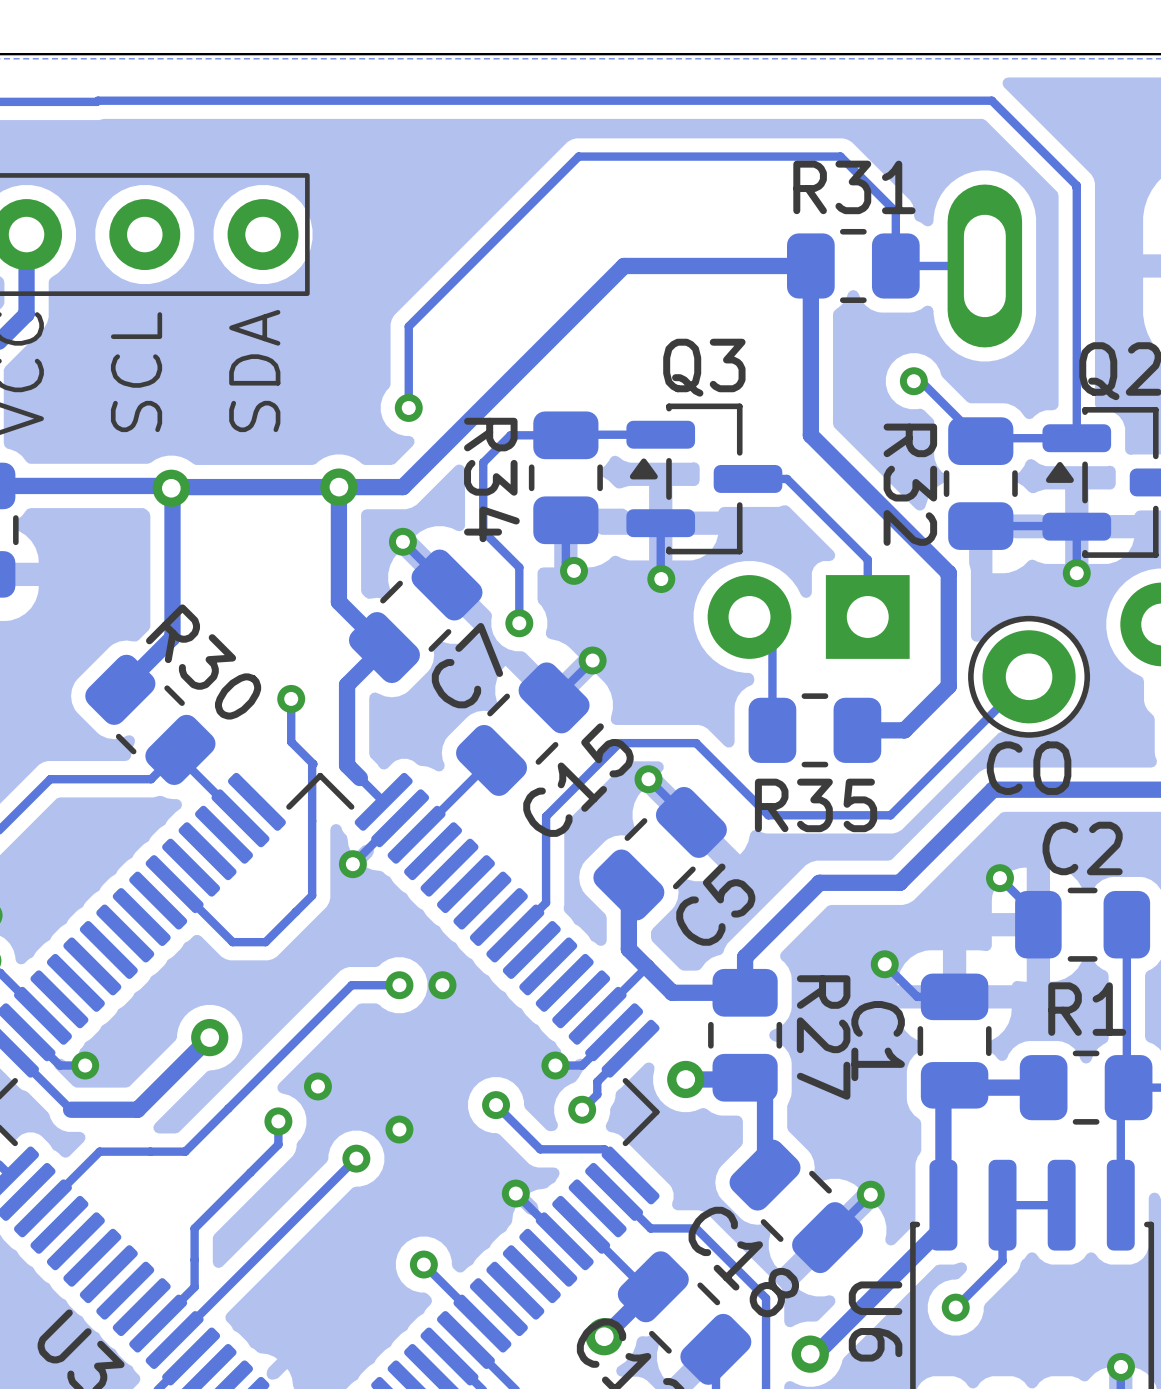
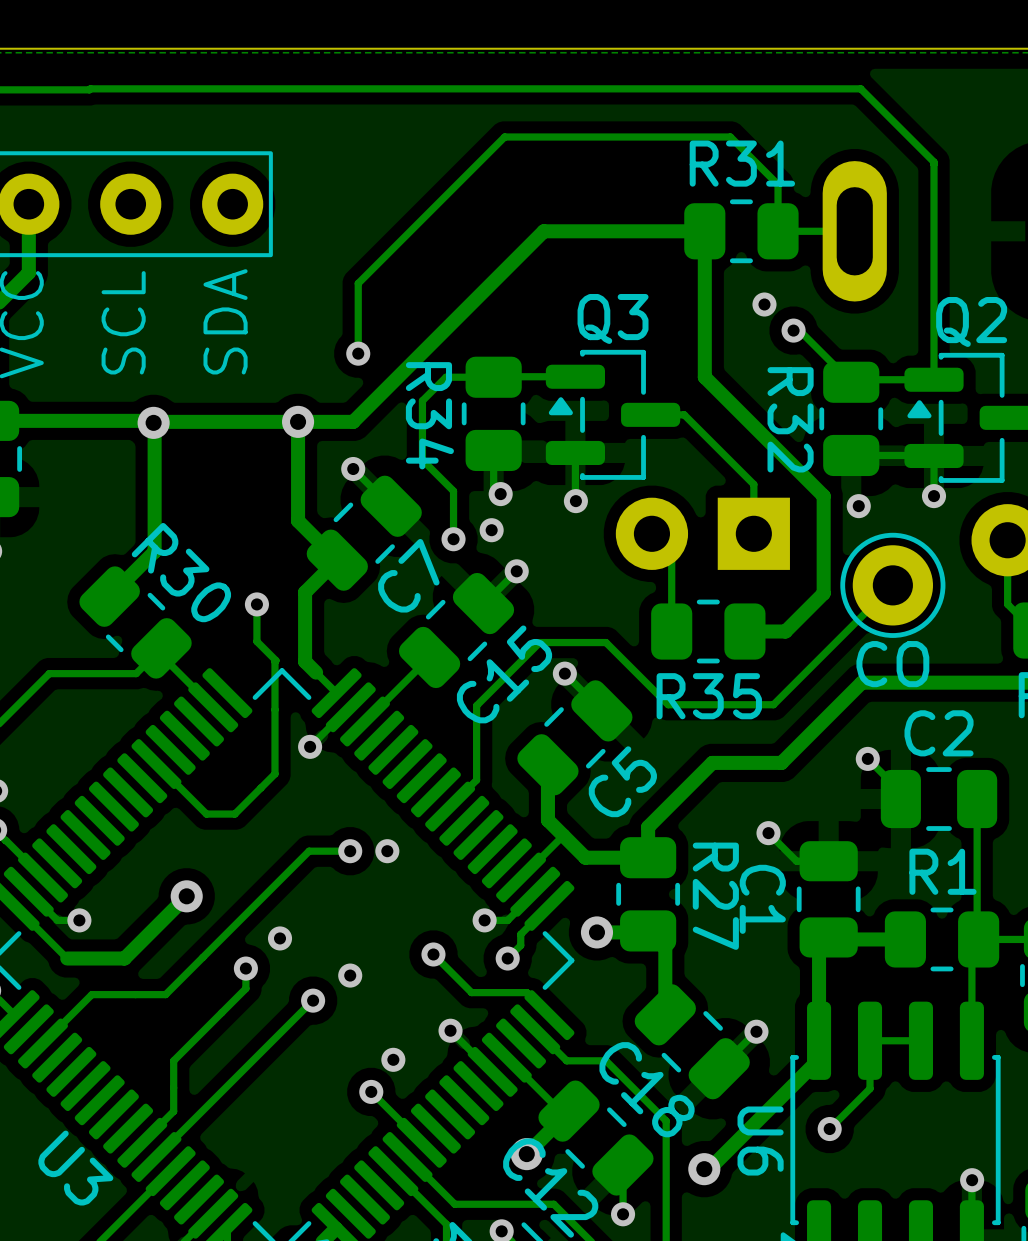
via: none -> (764, 304)
via: none -> (858, 506)
via: none -> (491, 530)
via: none -> (393, 1059)

